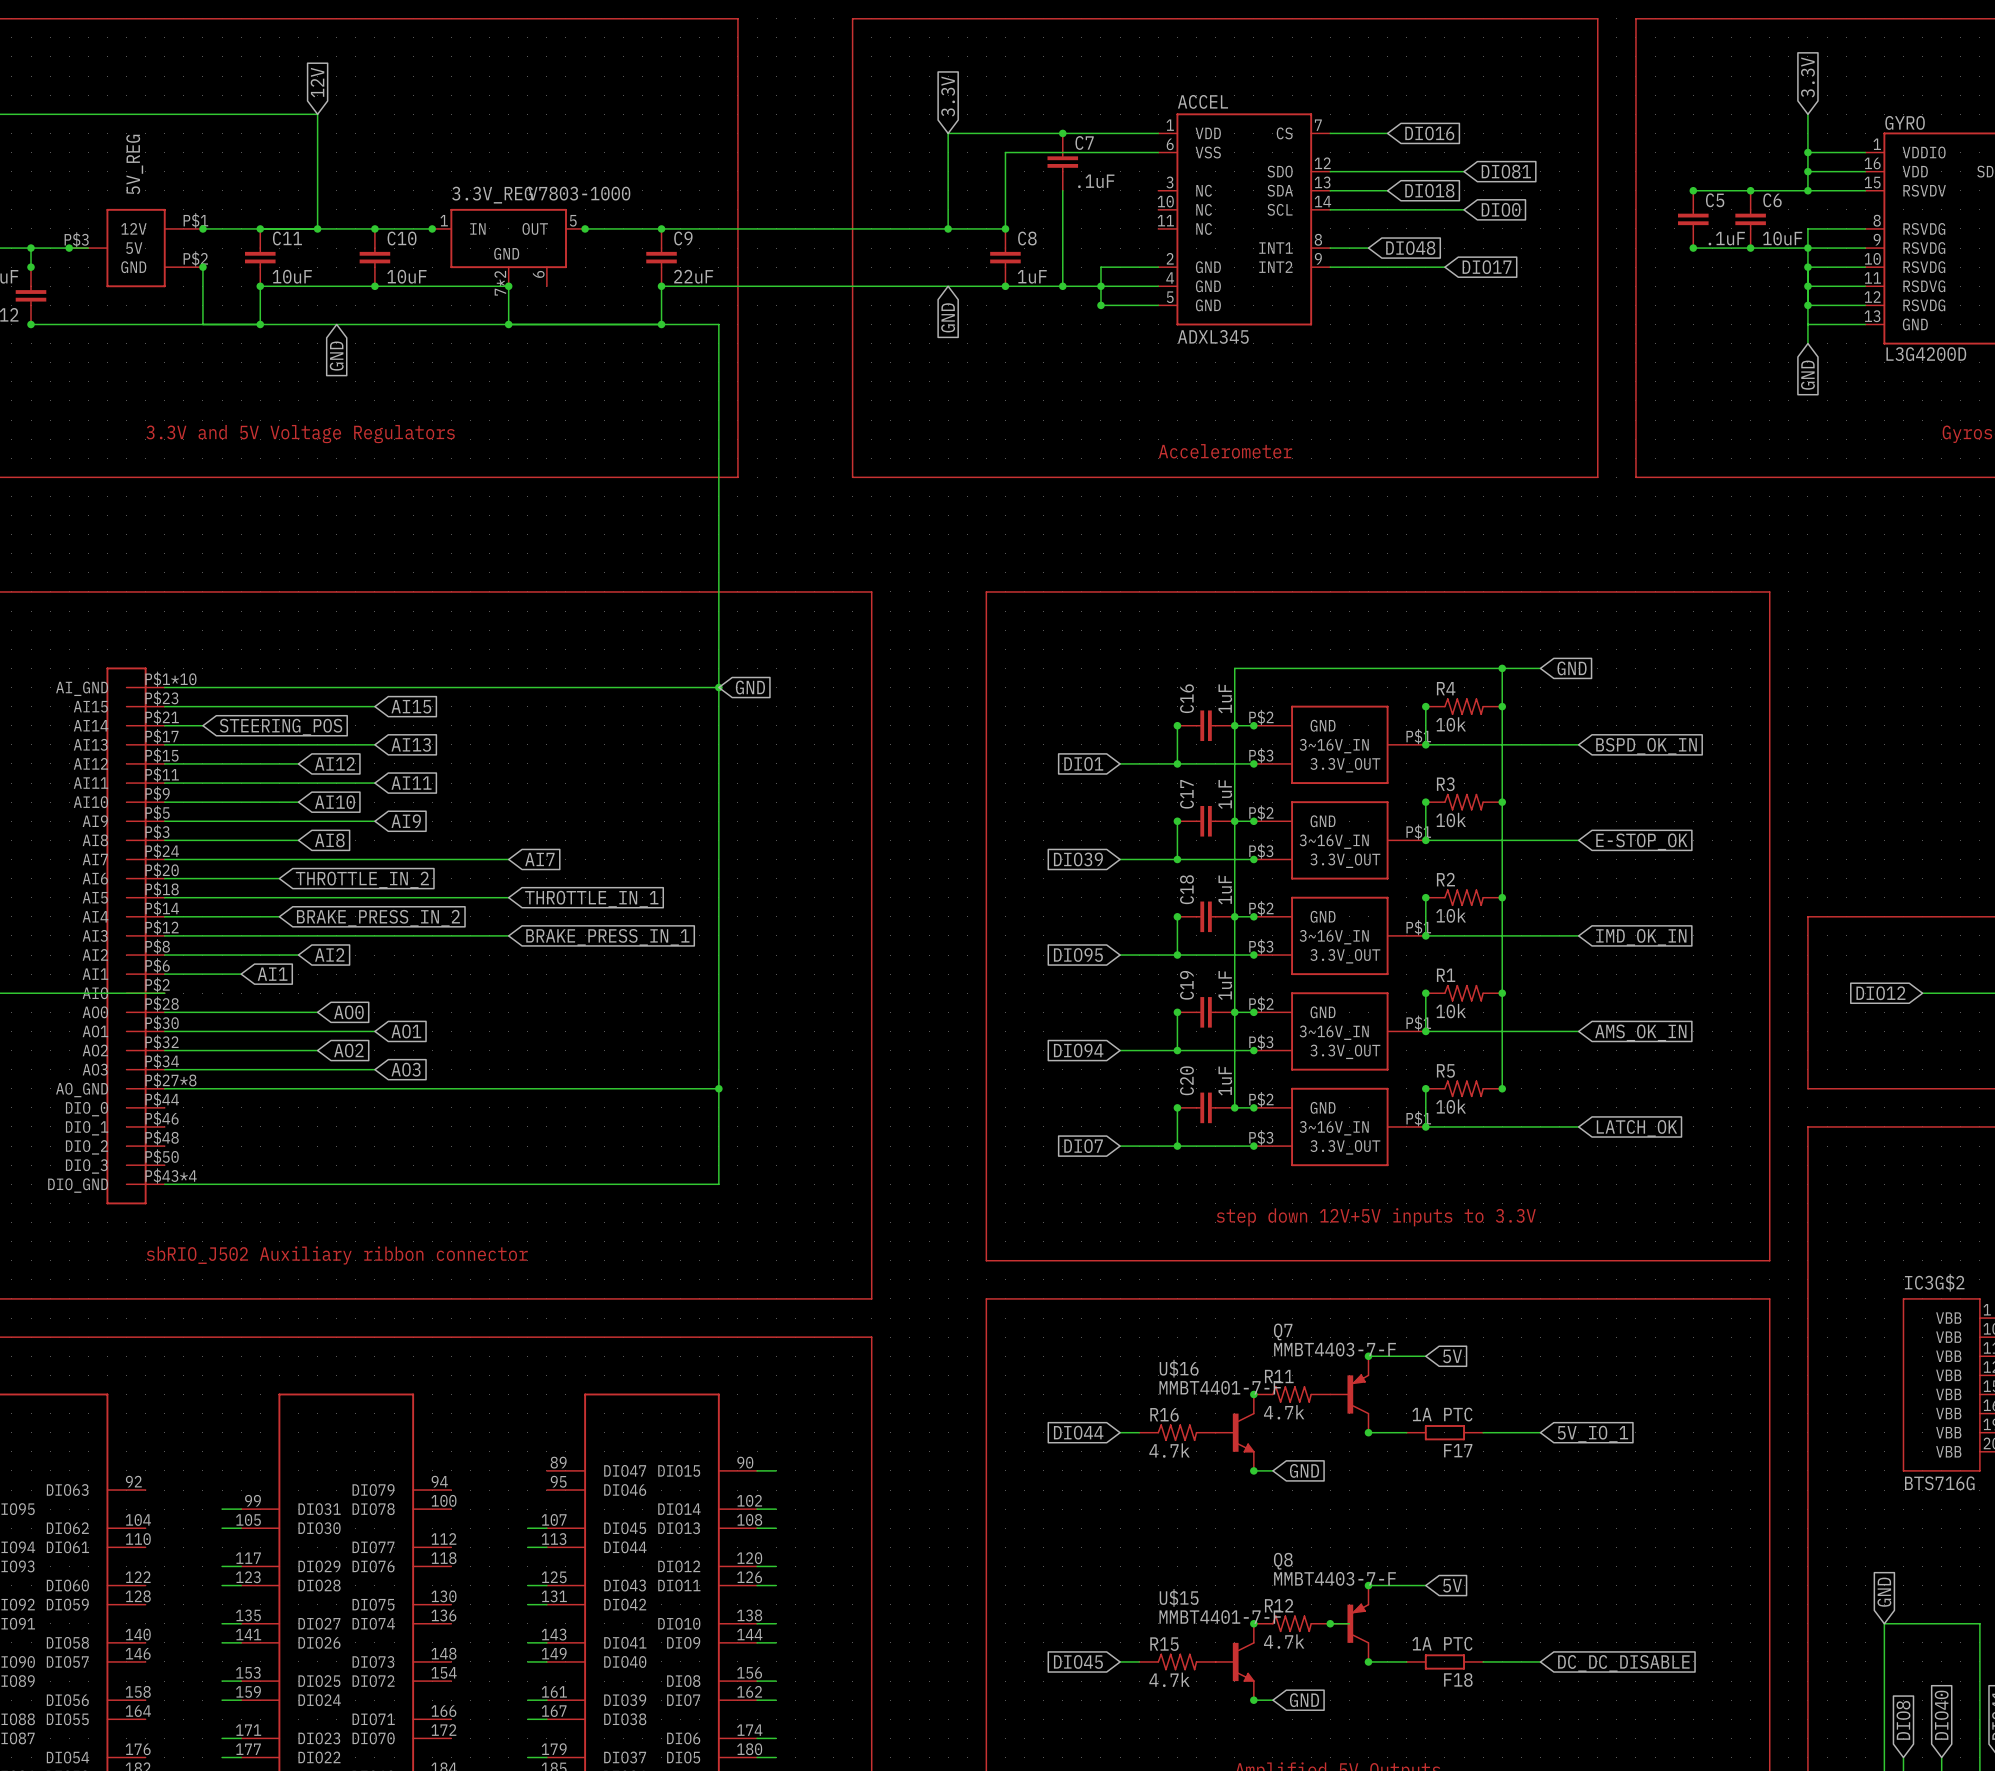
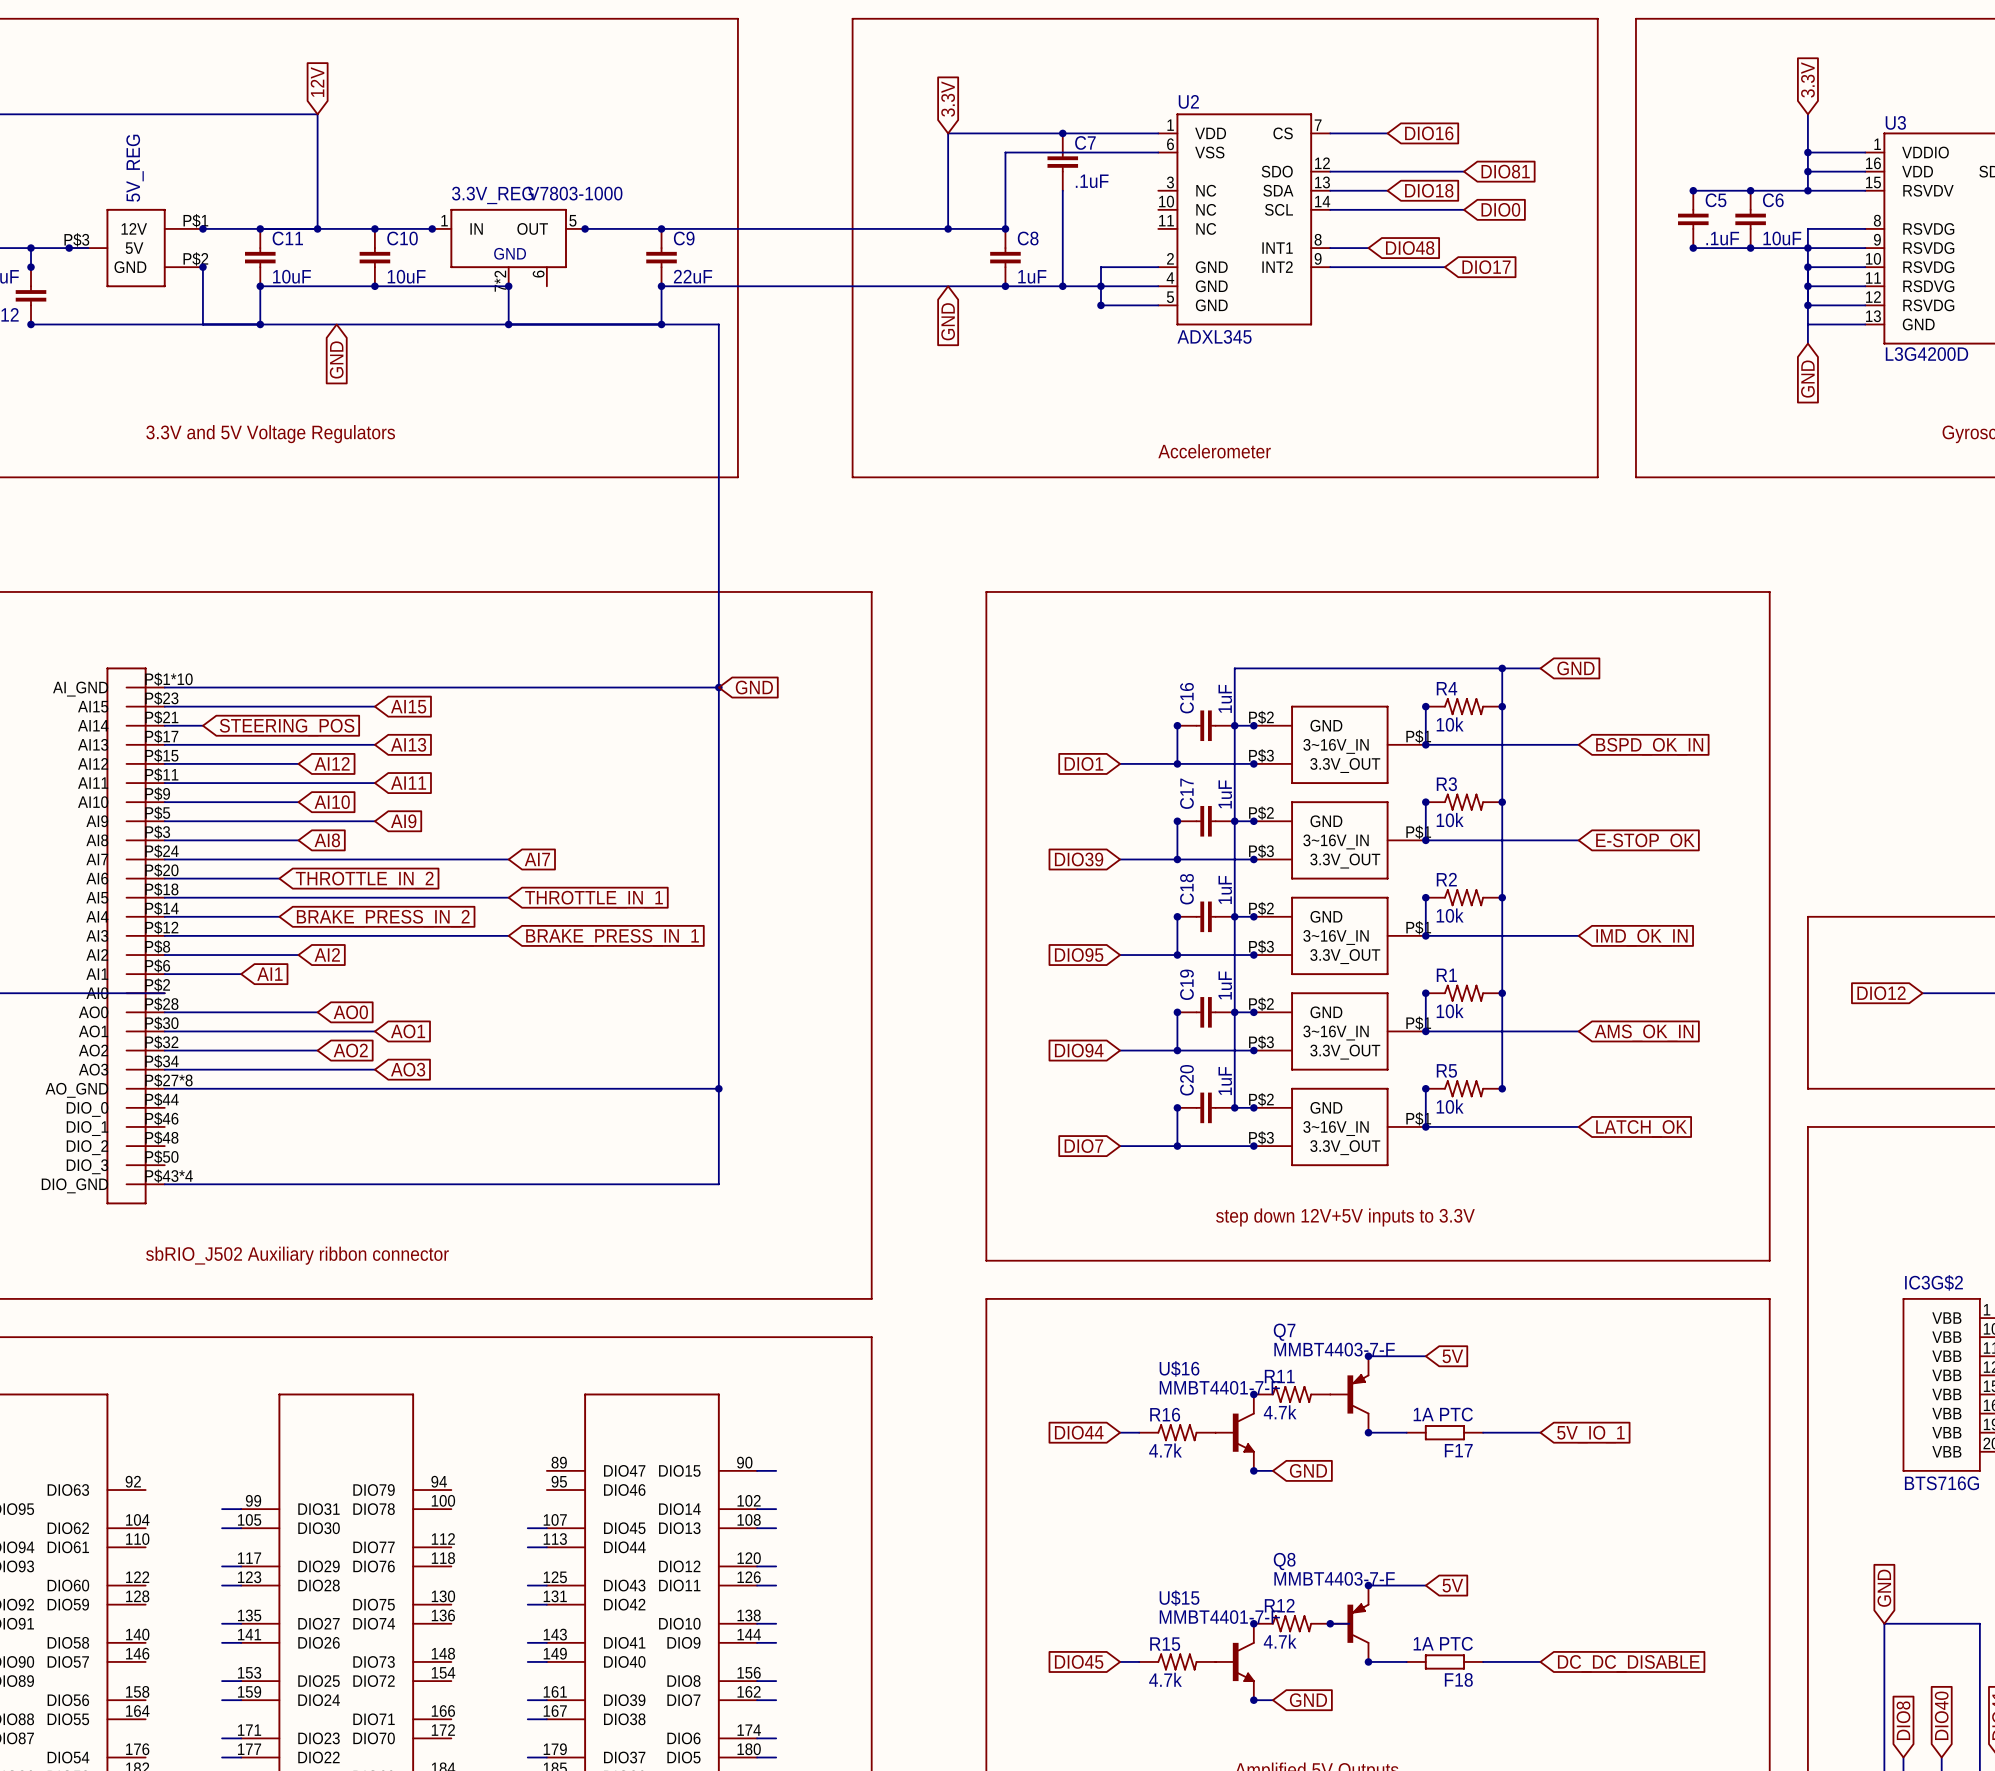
ACCEL name: ACCEL (1202, 101) -> U2 (1188, 101)
GYRO name: GYRO (1905, 122) -> U3 (1895, 122)

